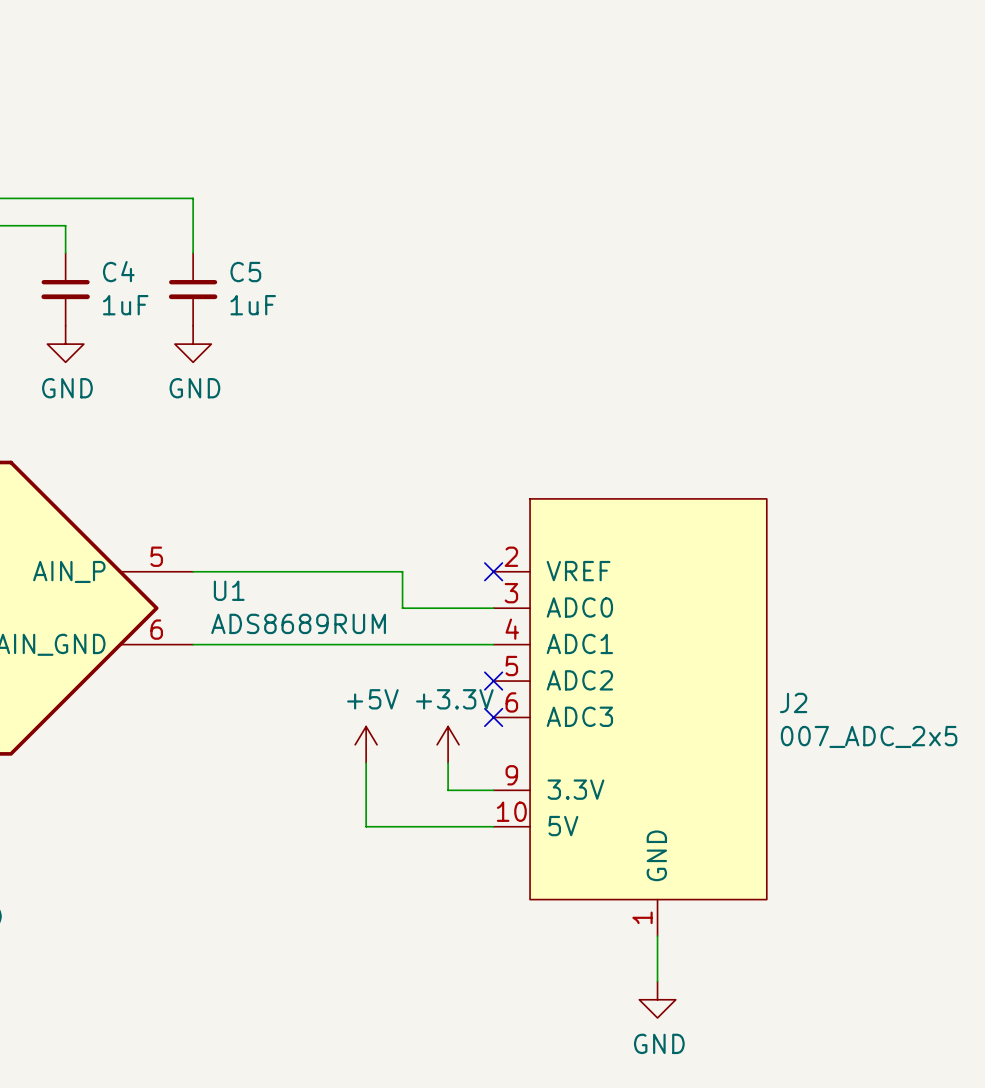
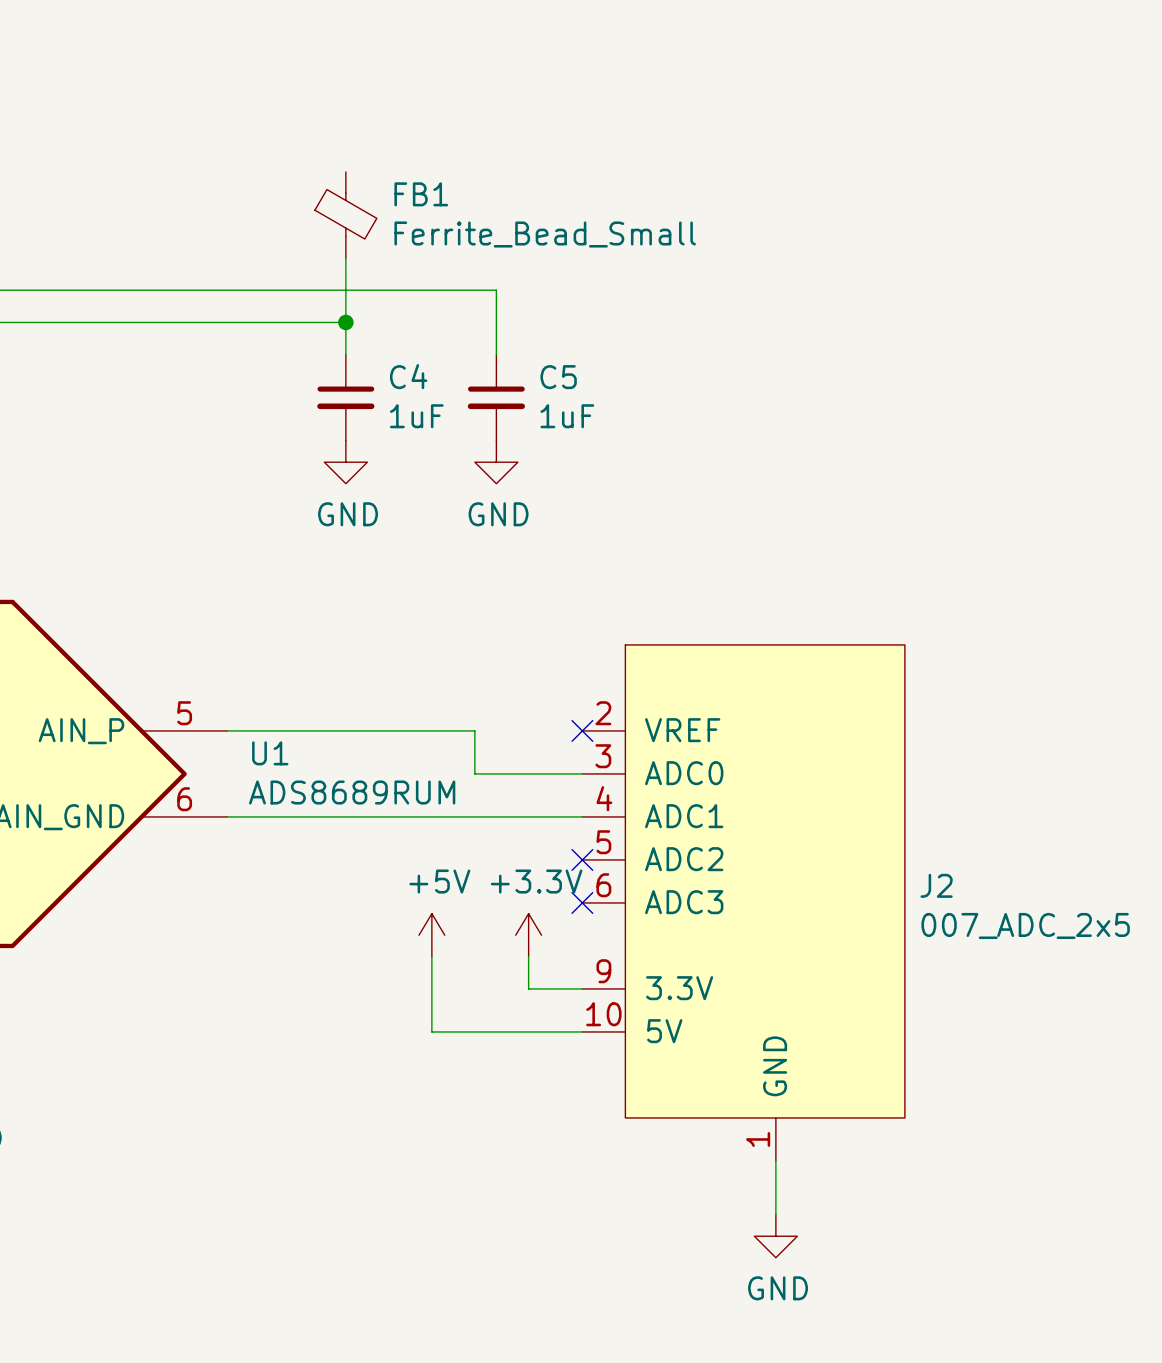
FB1: none -> Ferrite_Bead_Small (345, 214)
wire: none -> (345, 257) (345, 354)
wire: (193, 198) (193, 253) -> (227, 290) (496, 290) (496, 354)
wire: (65, 225) (65, 253) -> (77, 322) (345, 322)
junction: none -> (345, 322)
C4 position: (65, 289) -> (345, 397)
C5 position: (193, 289) -> (496, 397)
power symbol: GND (65, 344) -> none
power symbol position: GND (193, 344) -> GND (345, 462)
power symbol: none -> GND (496, 462)

